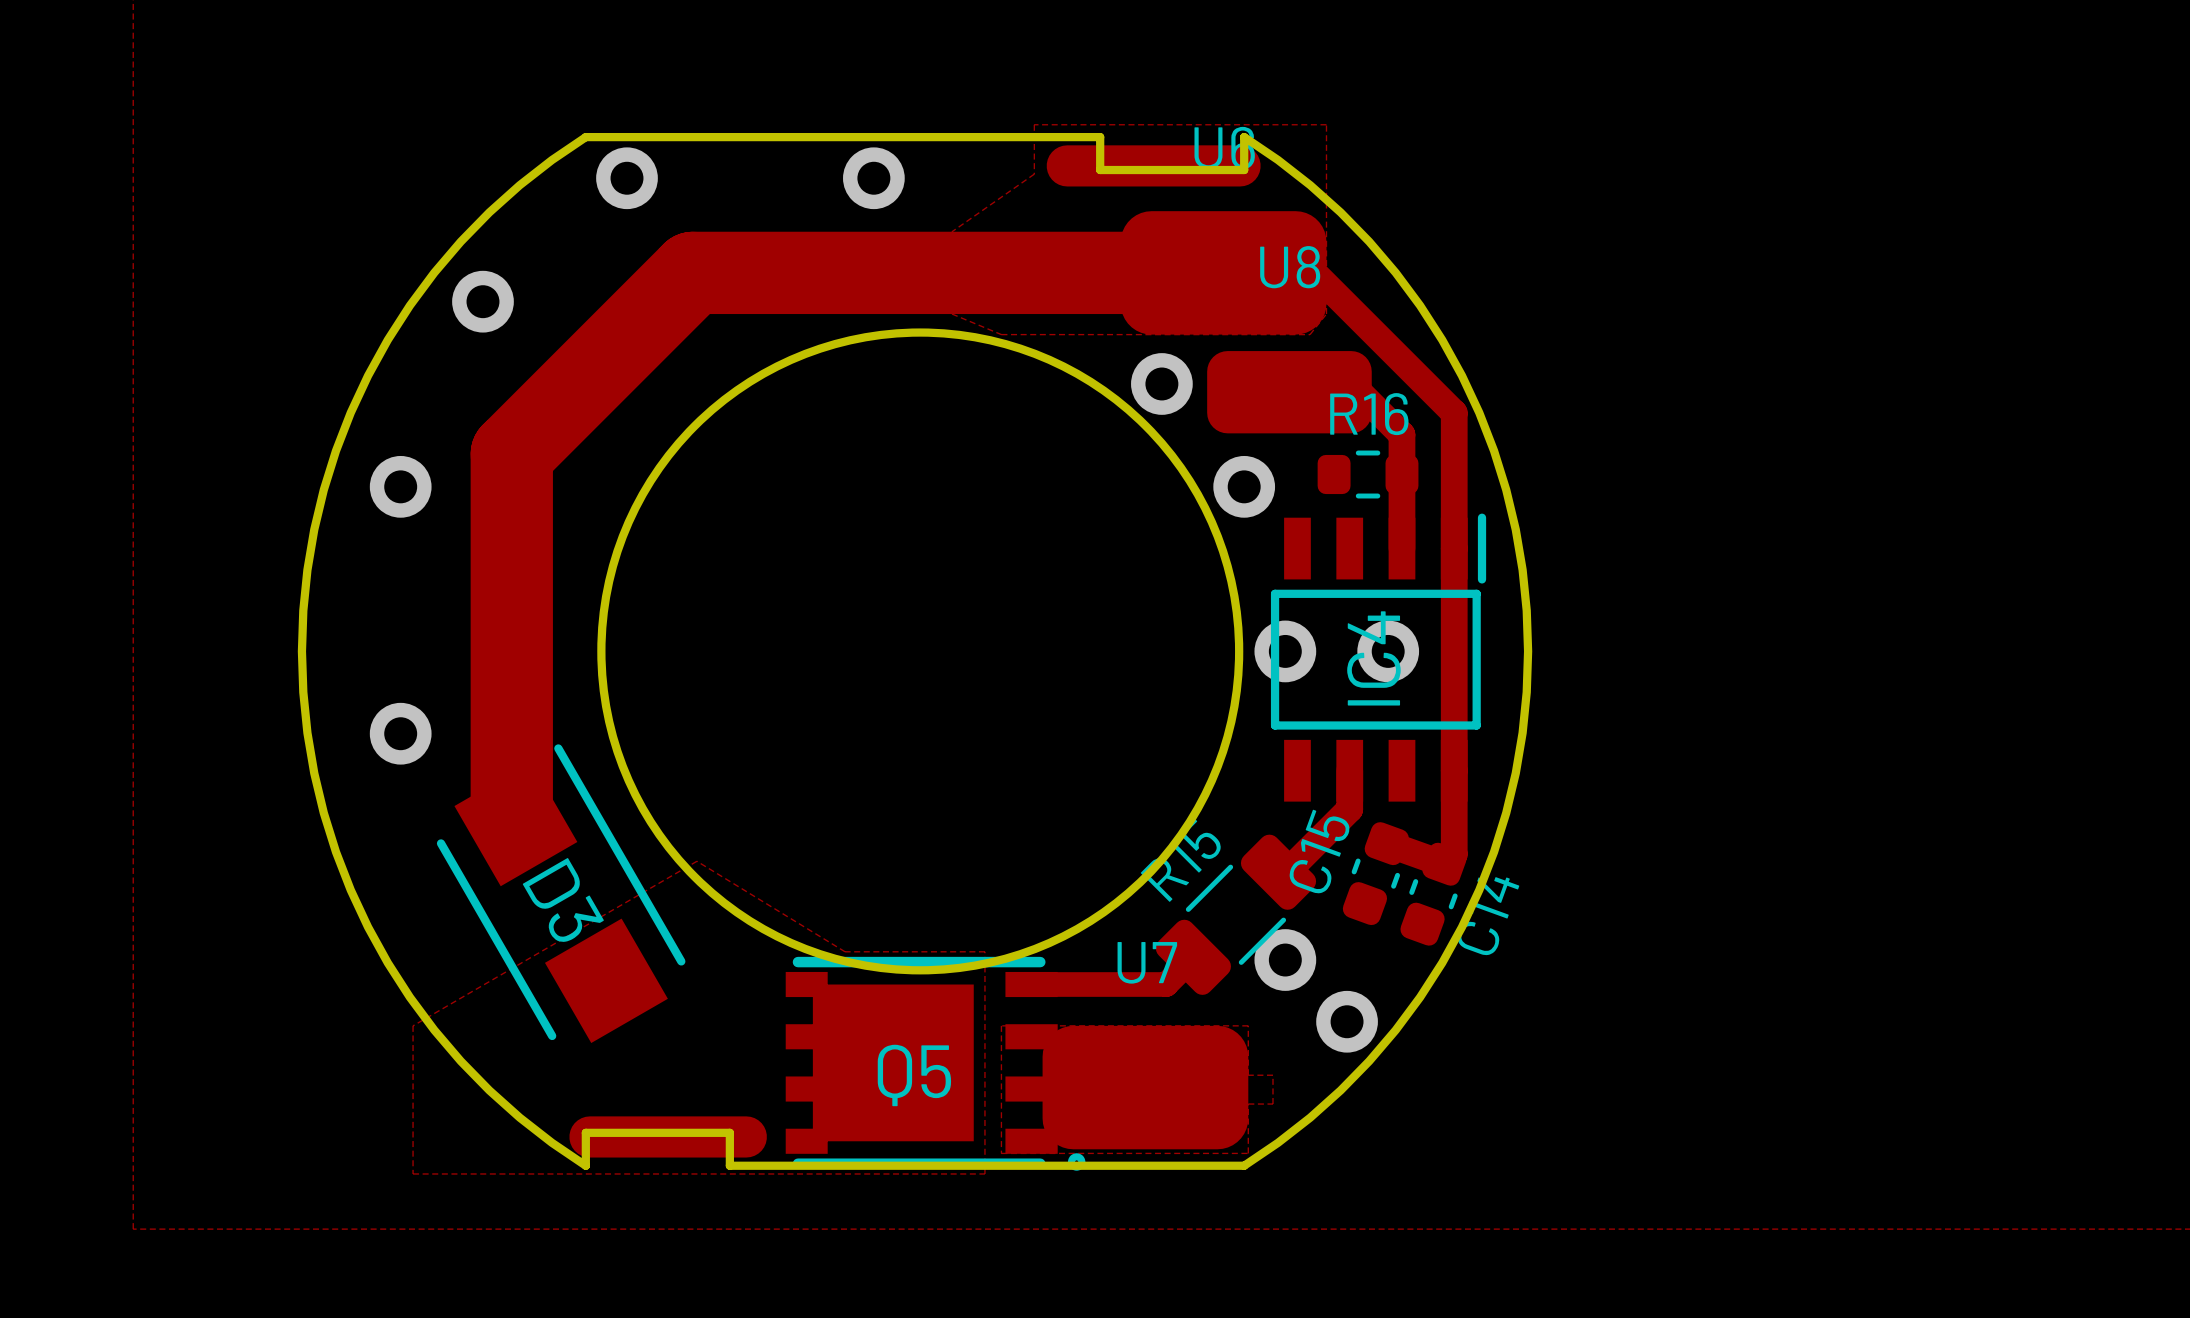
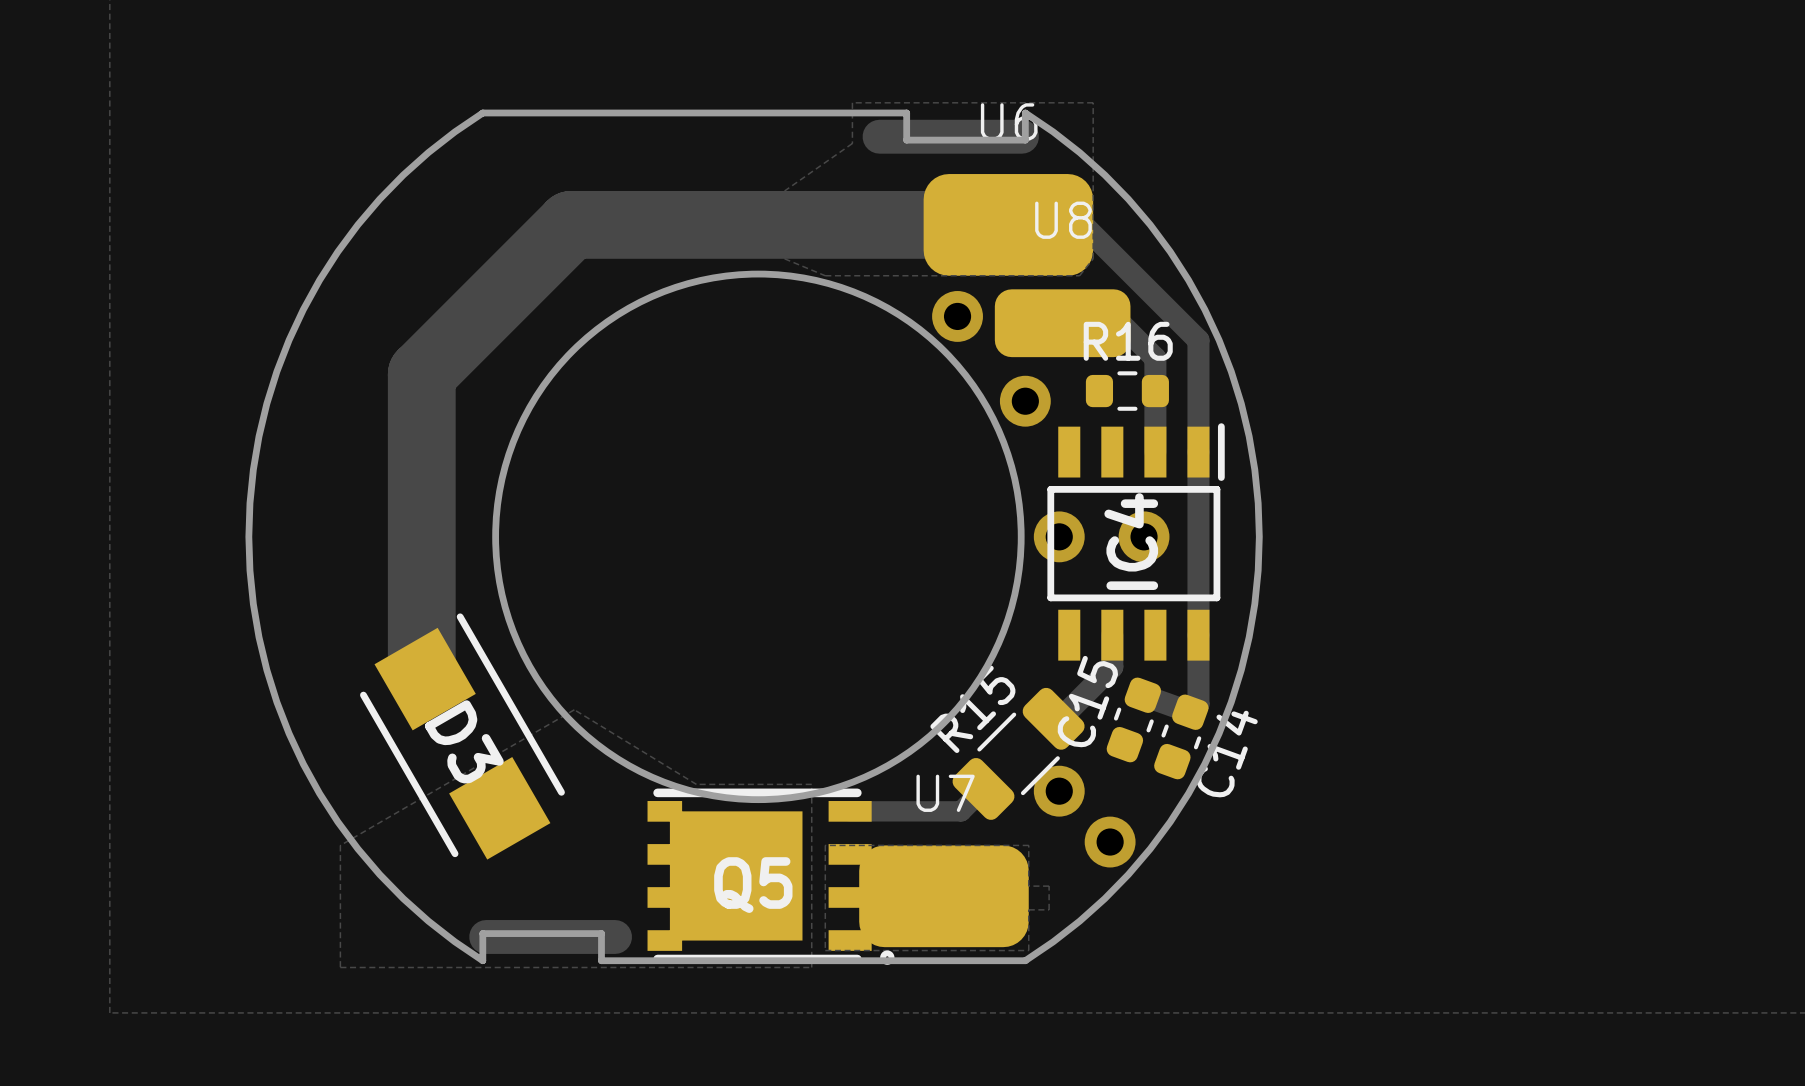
via: (627, 178) -> none
via: (873, 178) -> none
via: (482, 301) -> none
via: (400, 486) -> none
via: (400, 733) -> none

